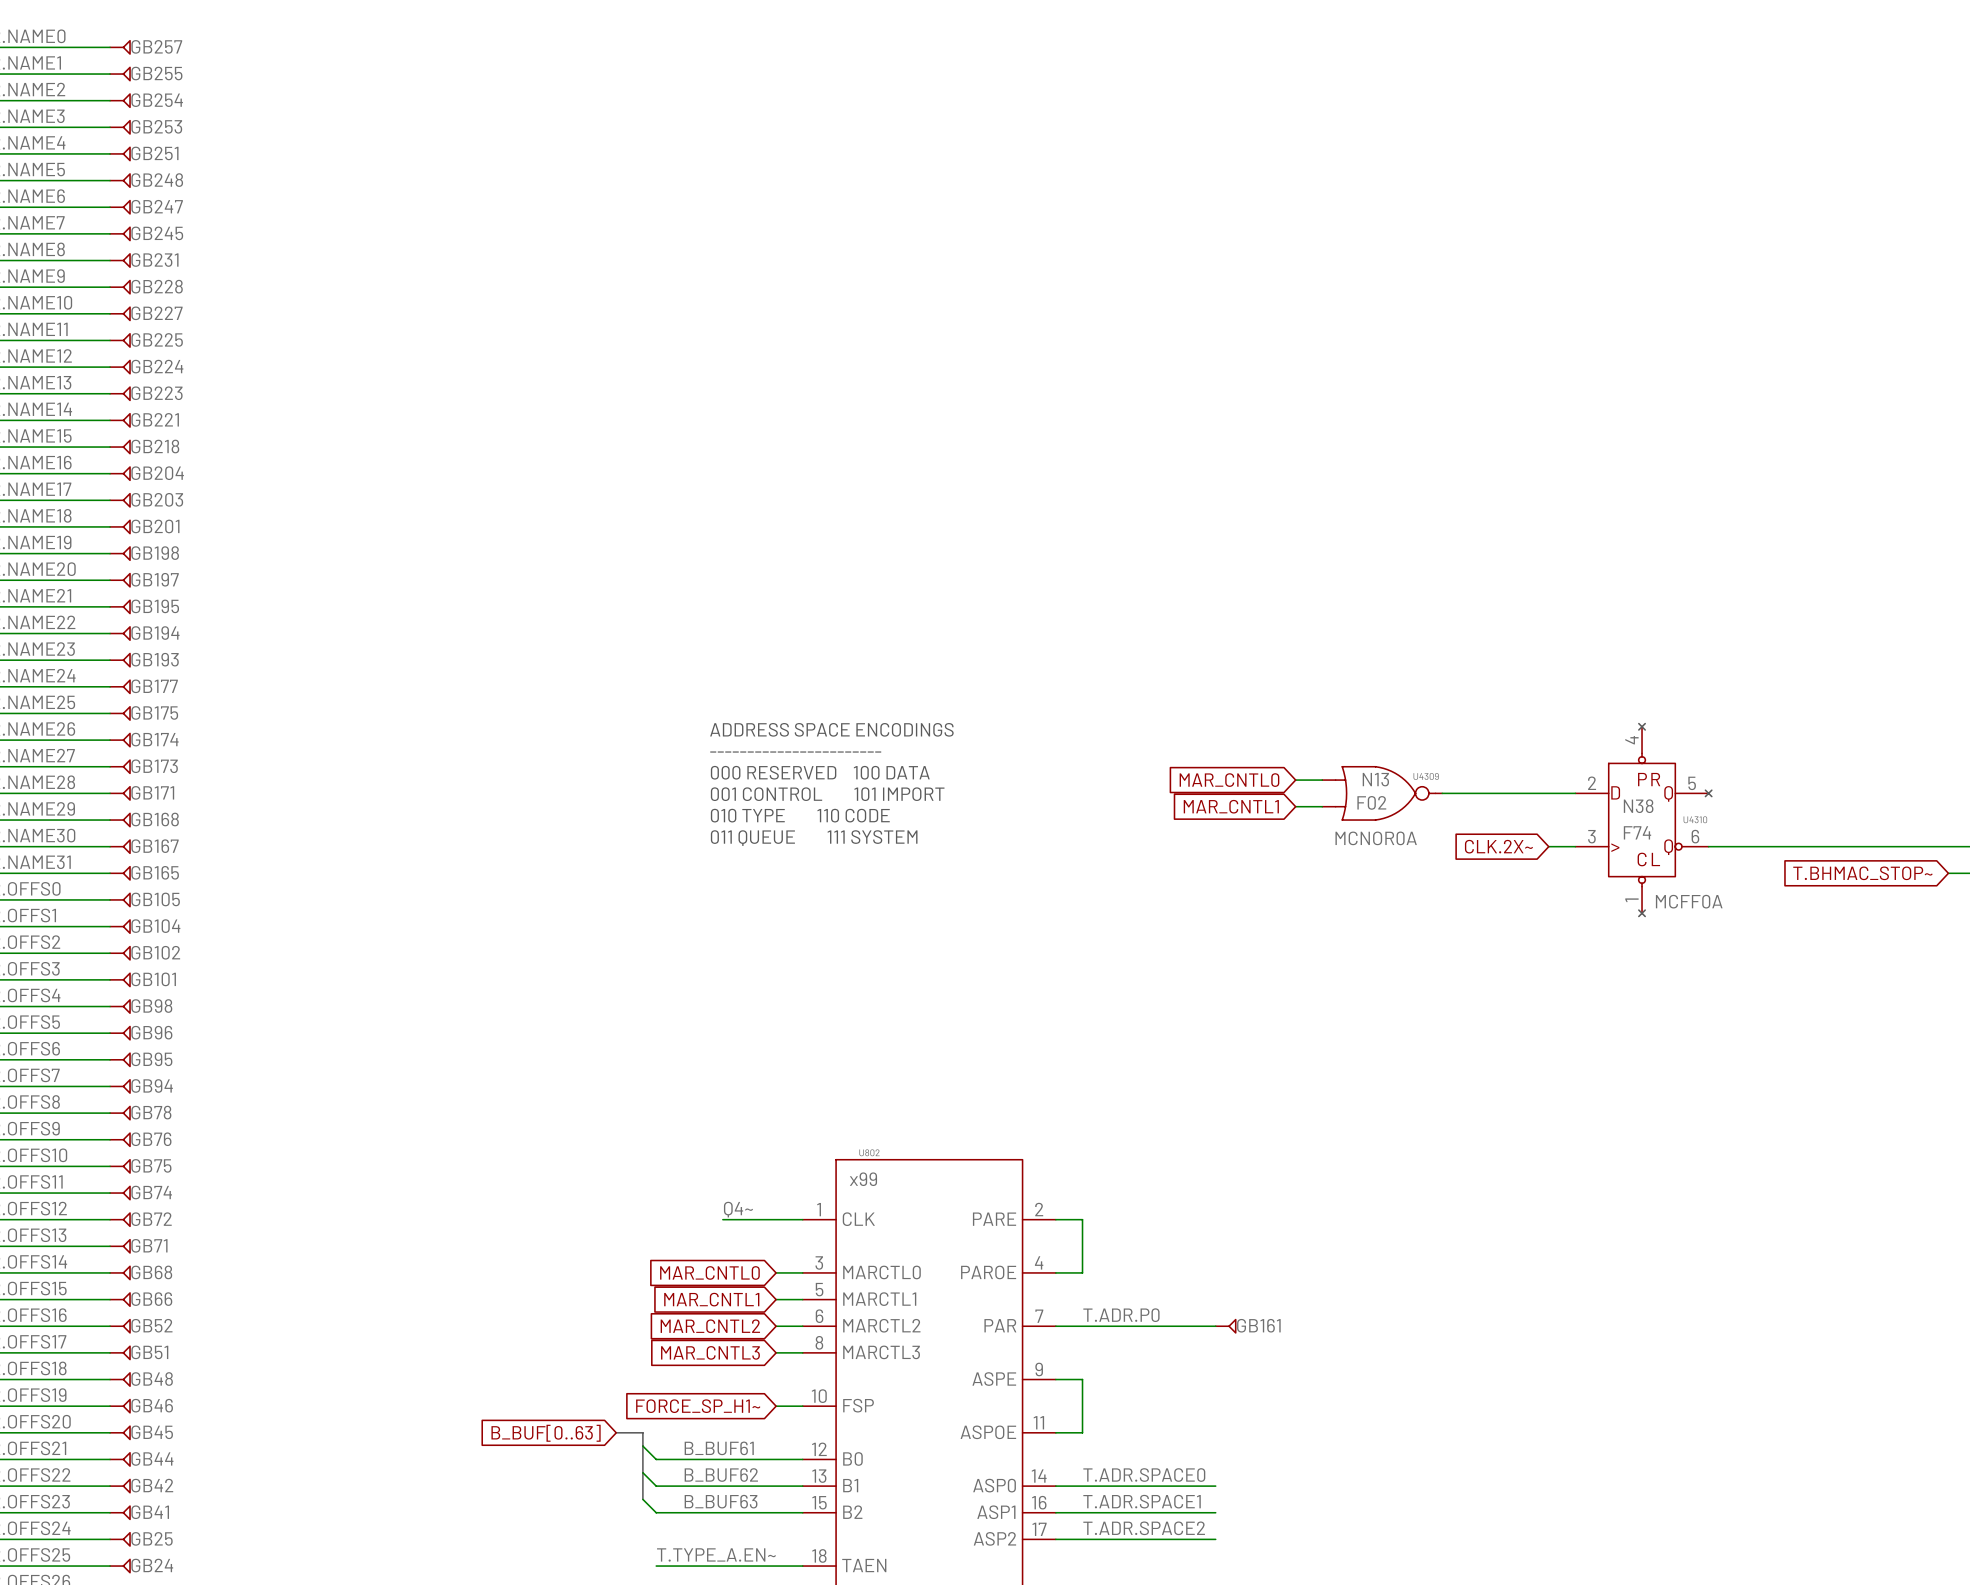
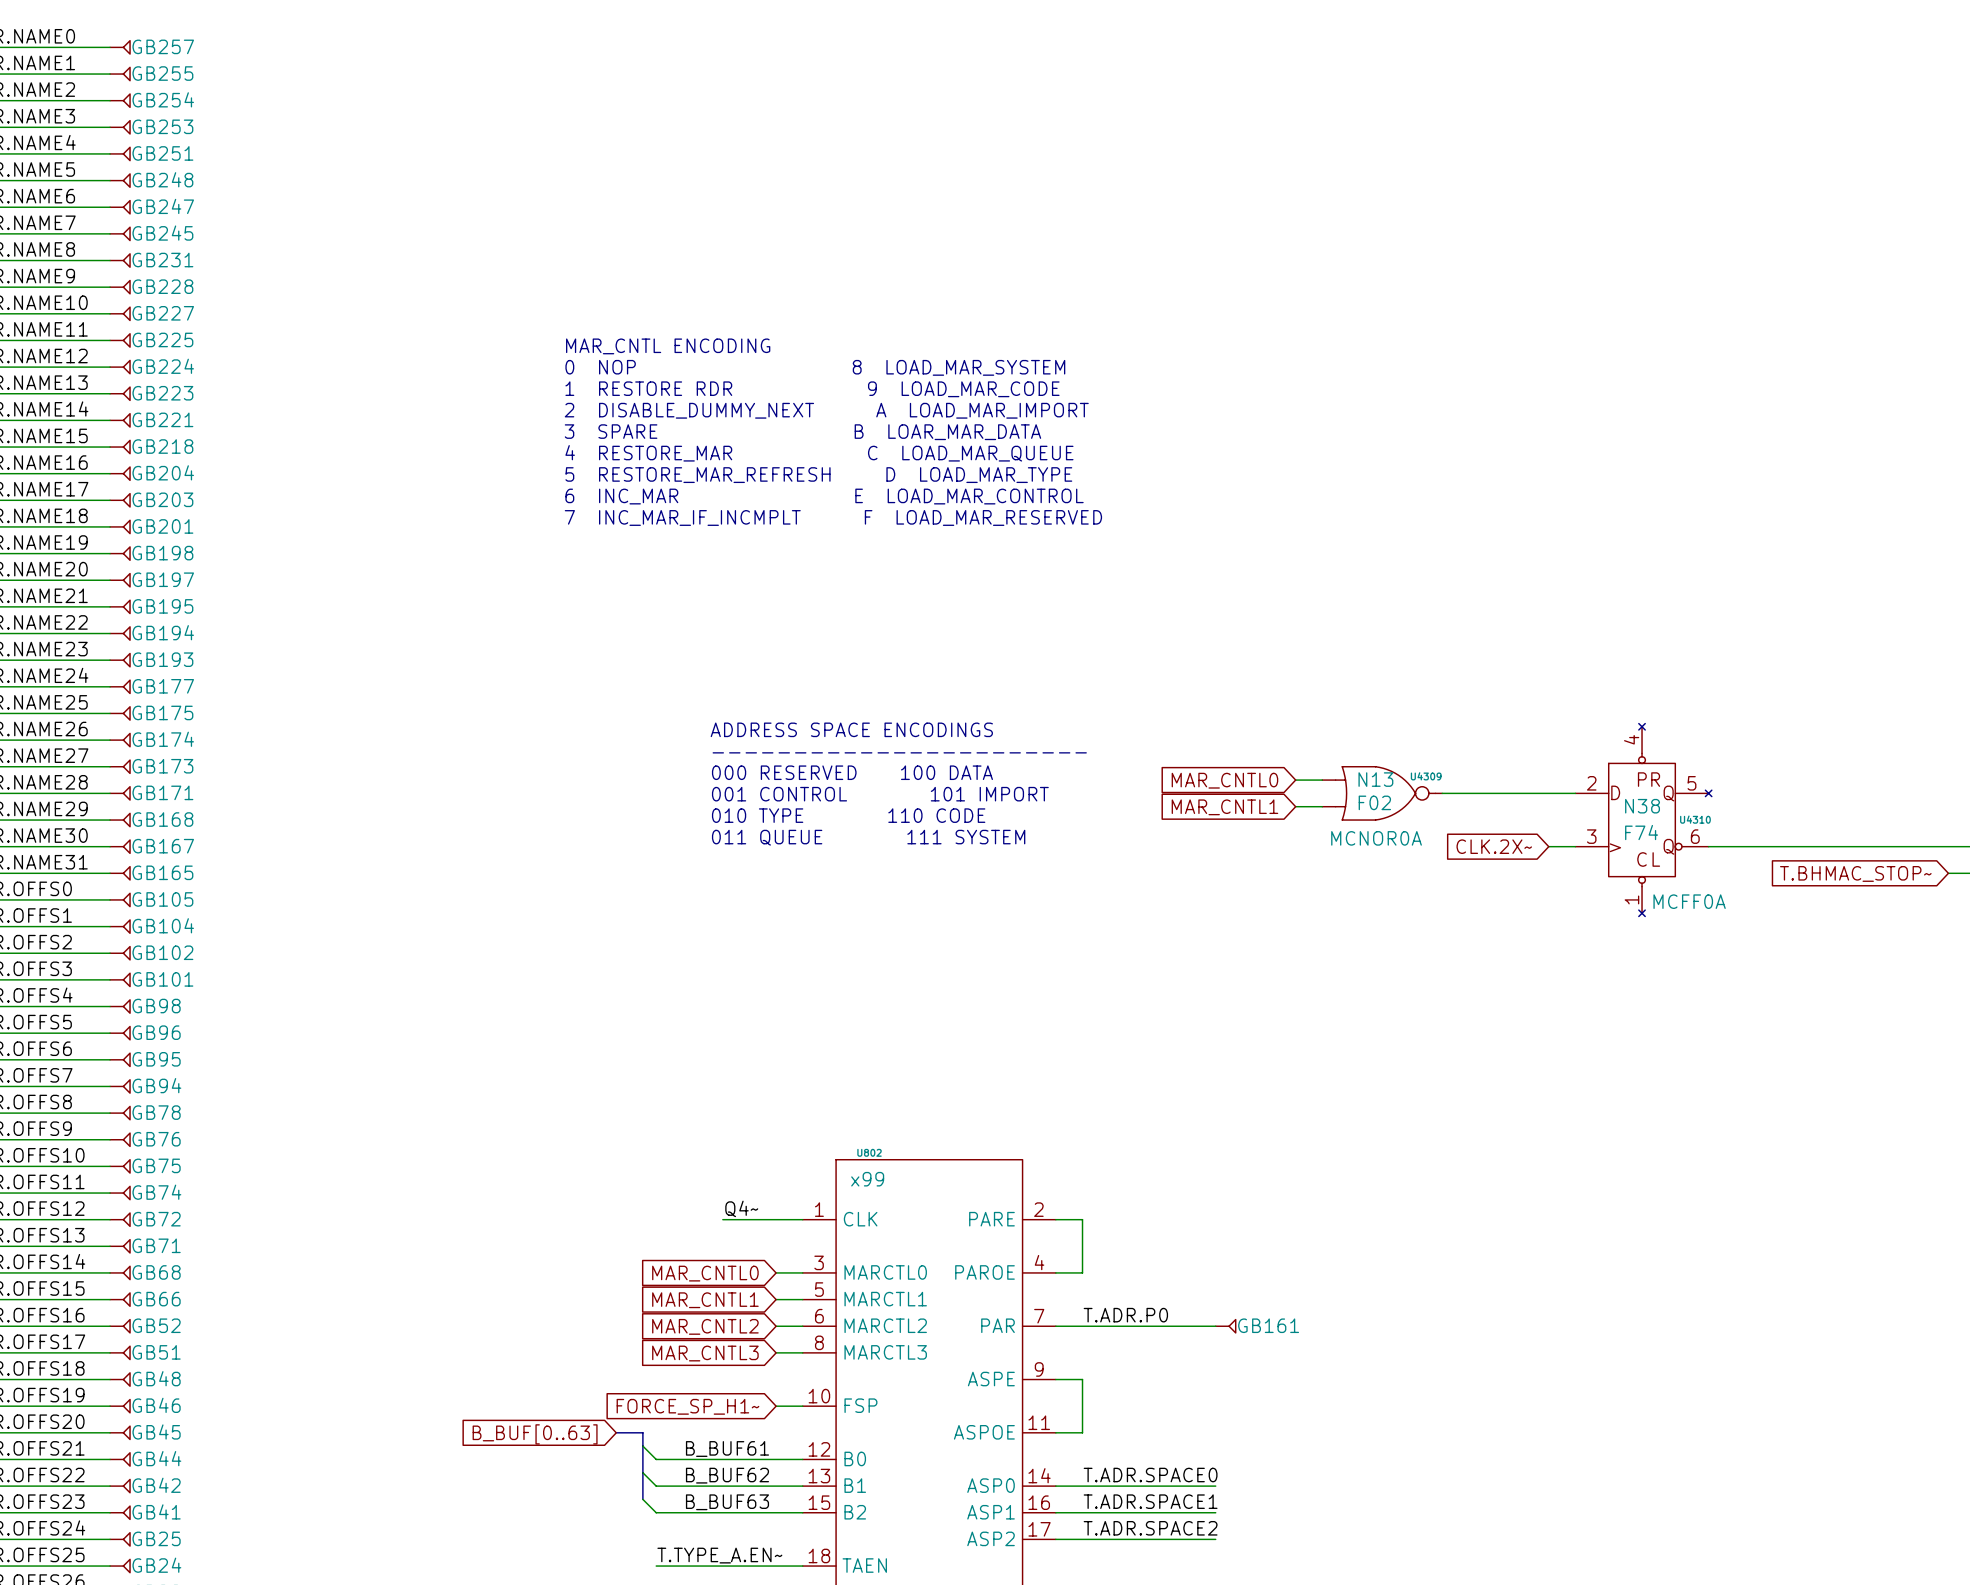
text: none -> MAR_CNTL ENCODING (668, 346)
text: none -> 0 NOP 8 LOAD_MAR_SYSTEM (815, 367)
text: none -> 1 RESTORE RDR 9 LOAD_MAR_CODE (812, 389)
text: none -> 2 DISABLE_DUMMY_NEXT A LOAD_MAR_IMPORT (826, 410)
text: none -> 3 SPARE B LOAR_MAR_DATA (802, 432)
text: none -> 4 RESTORE_MAR C LOAD_MAR_QUEUE (819, 453)
text: none -> 5 RESTORE_MAR_REFRESH D LOAD_MAR_TYPE (818, 475)
text: none -> 6 INC_MAR E LOAD_MAR_CONTROL (824, 496)
text: none -> 7 INC_MAR_IF_INCMPLT F LOAD_MAR_RESERVED (833, 517)

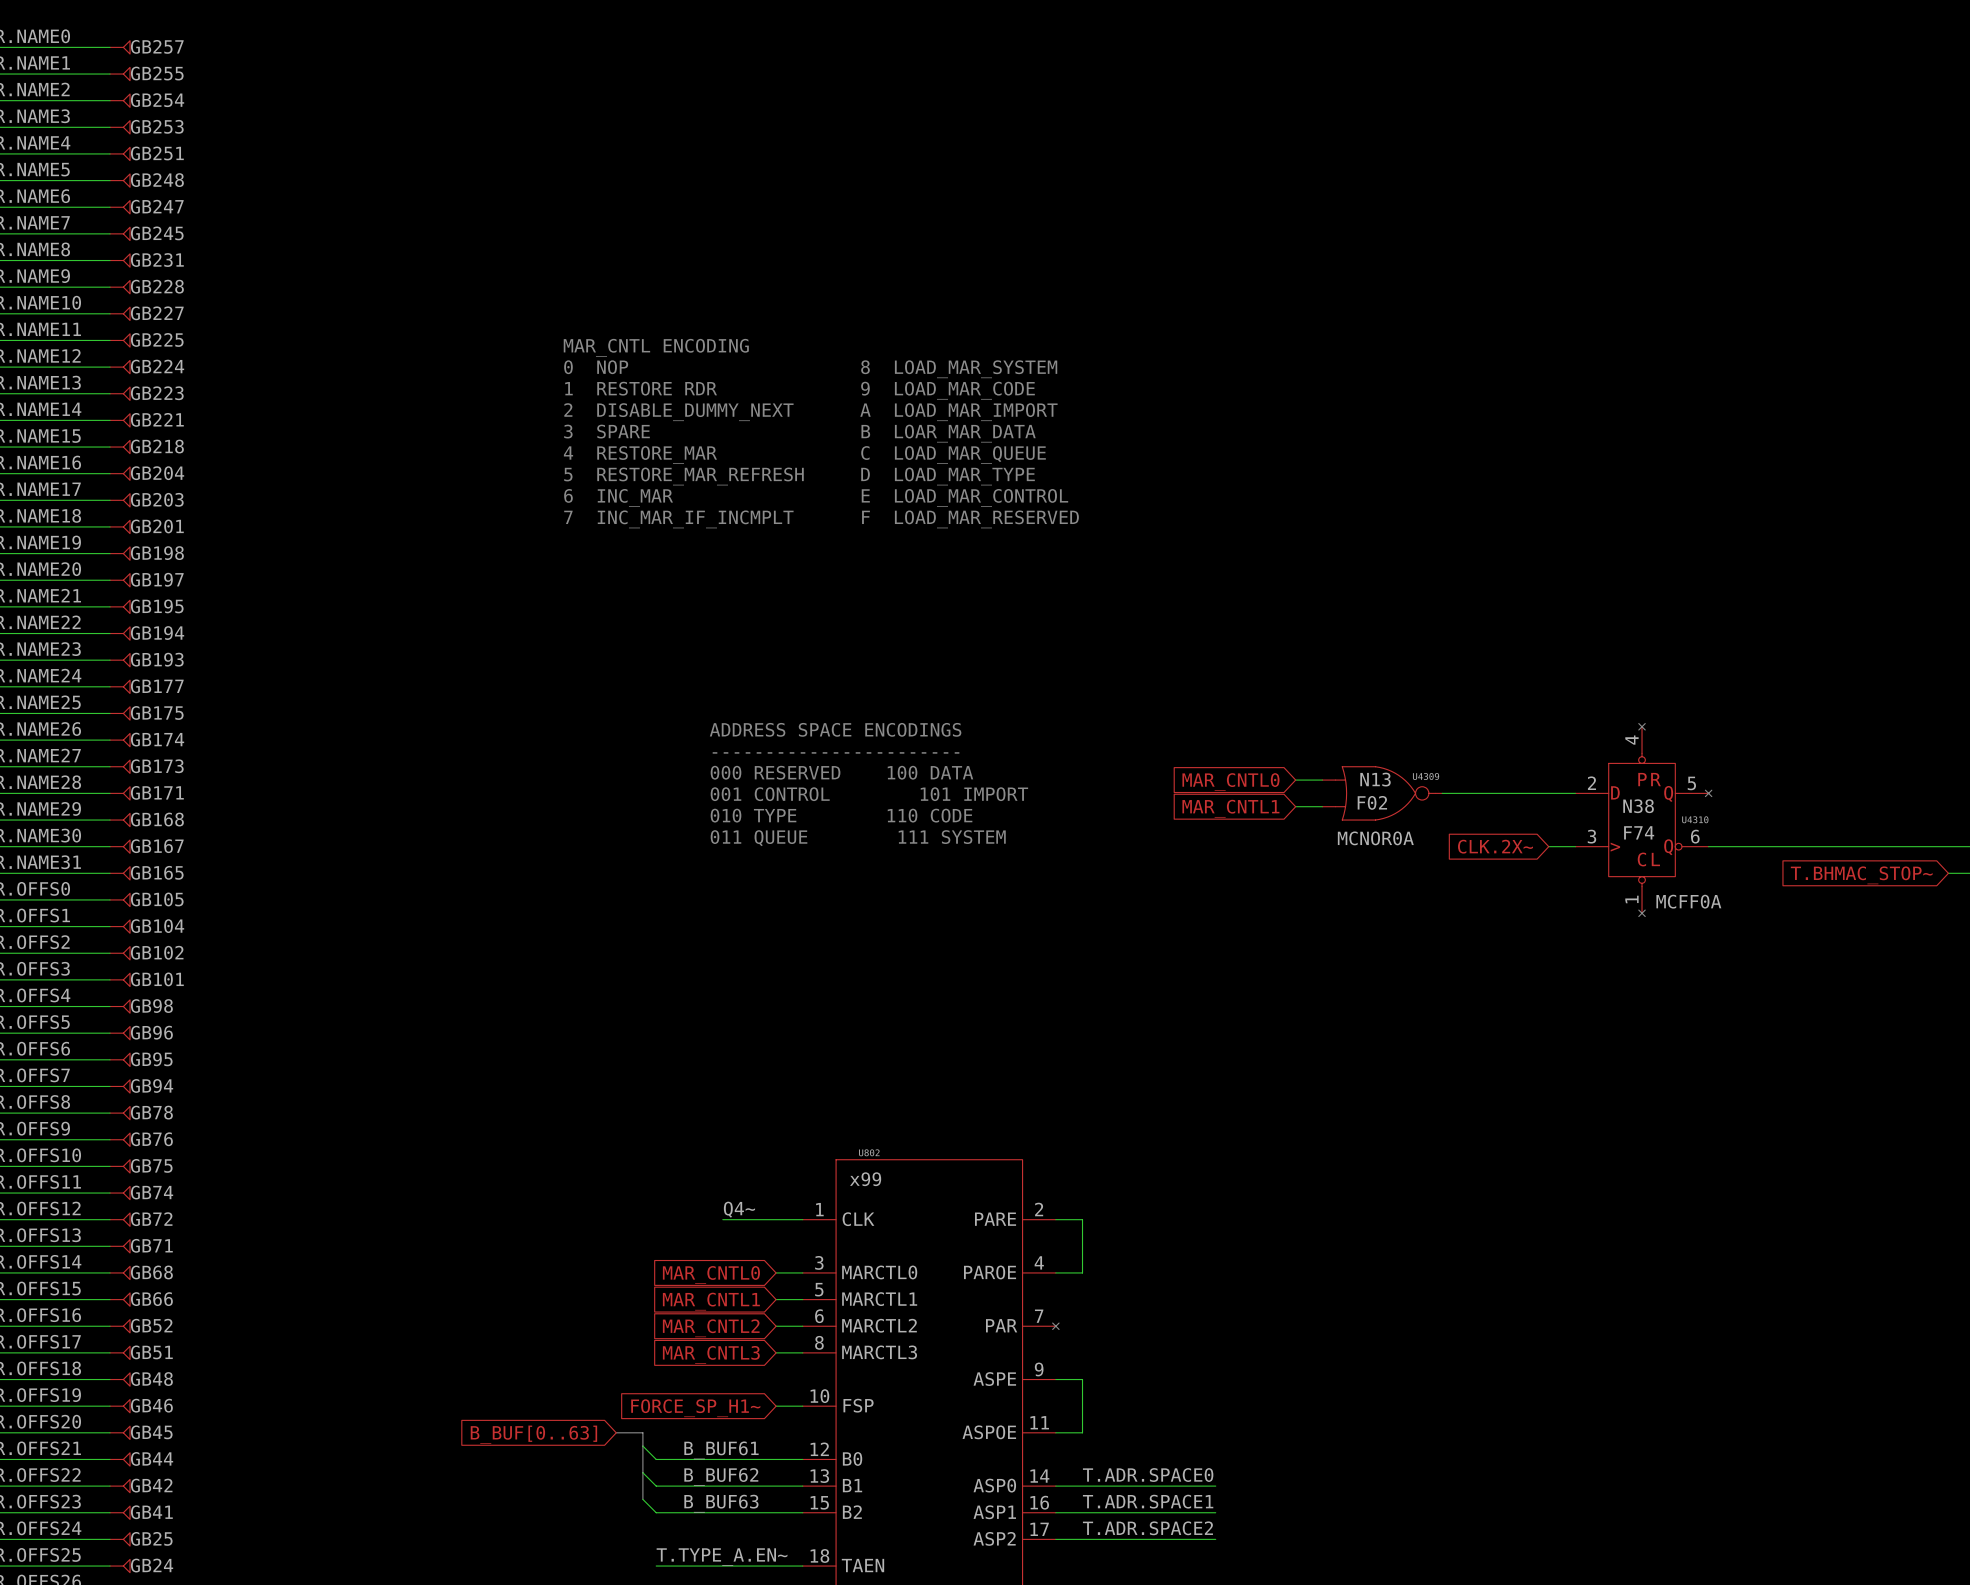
label: T.ADR.P0 (1125, 1315) -> none
wire: (1055, 1326) (1215, 1326) -> none
no-connect mark: none -> (1055, 1326)
GB161: (1225, 1326) -> none

